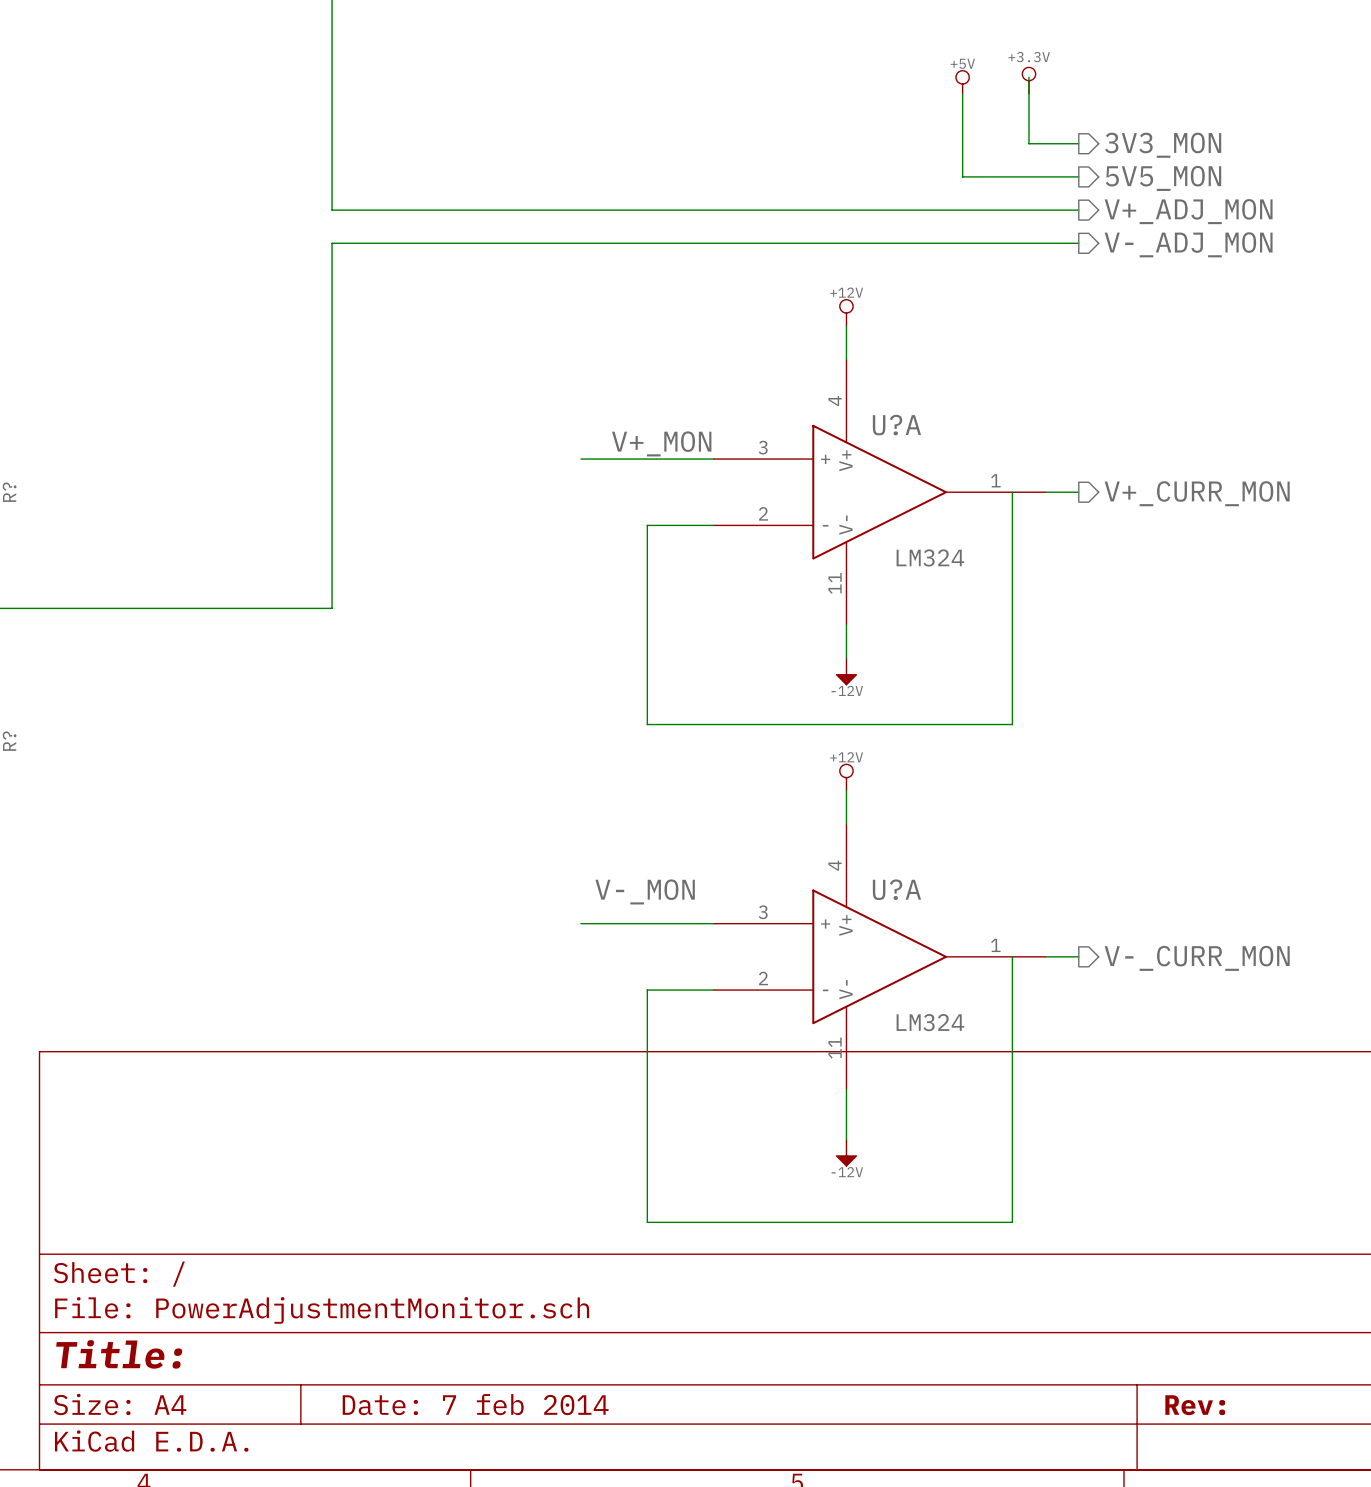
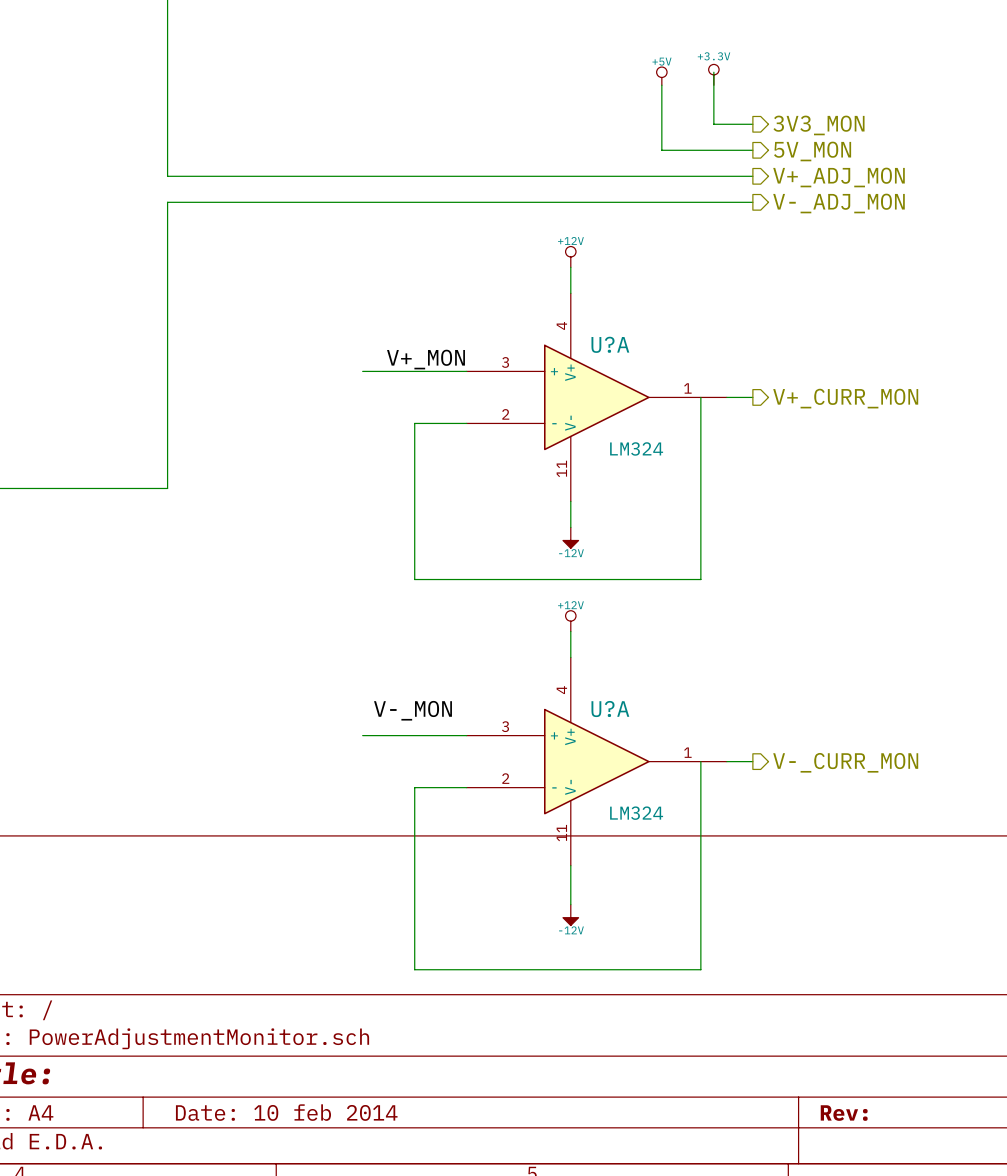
hierarchical label: 5V5_MON (1163, 178) -> 5V_MON (812, 151)
title block: Date: 7 feb 2014 (475, 1404) -> Date: 10 feb 2014 (286, 1112)

